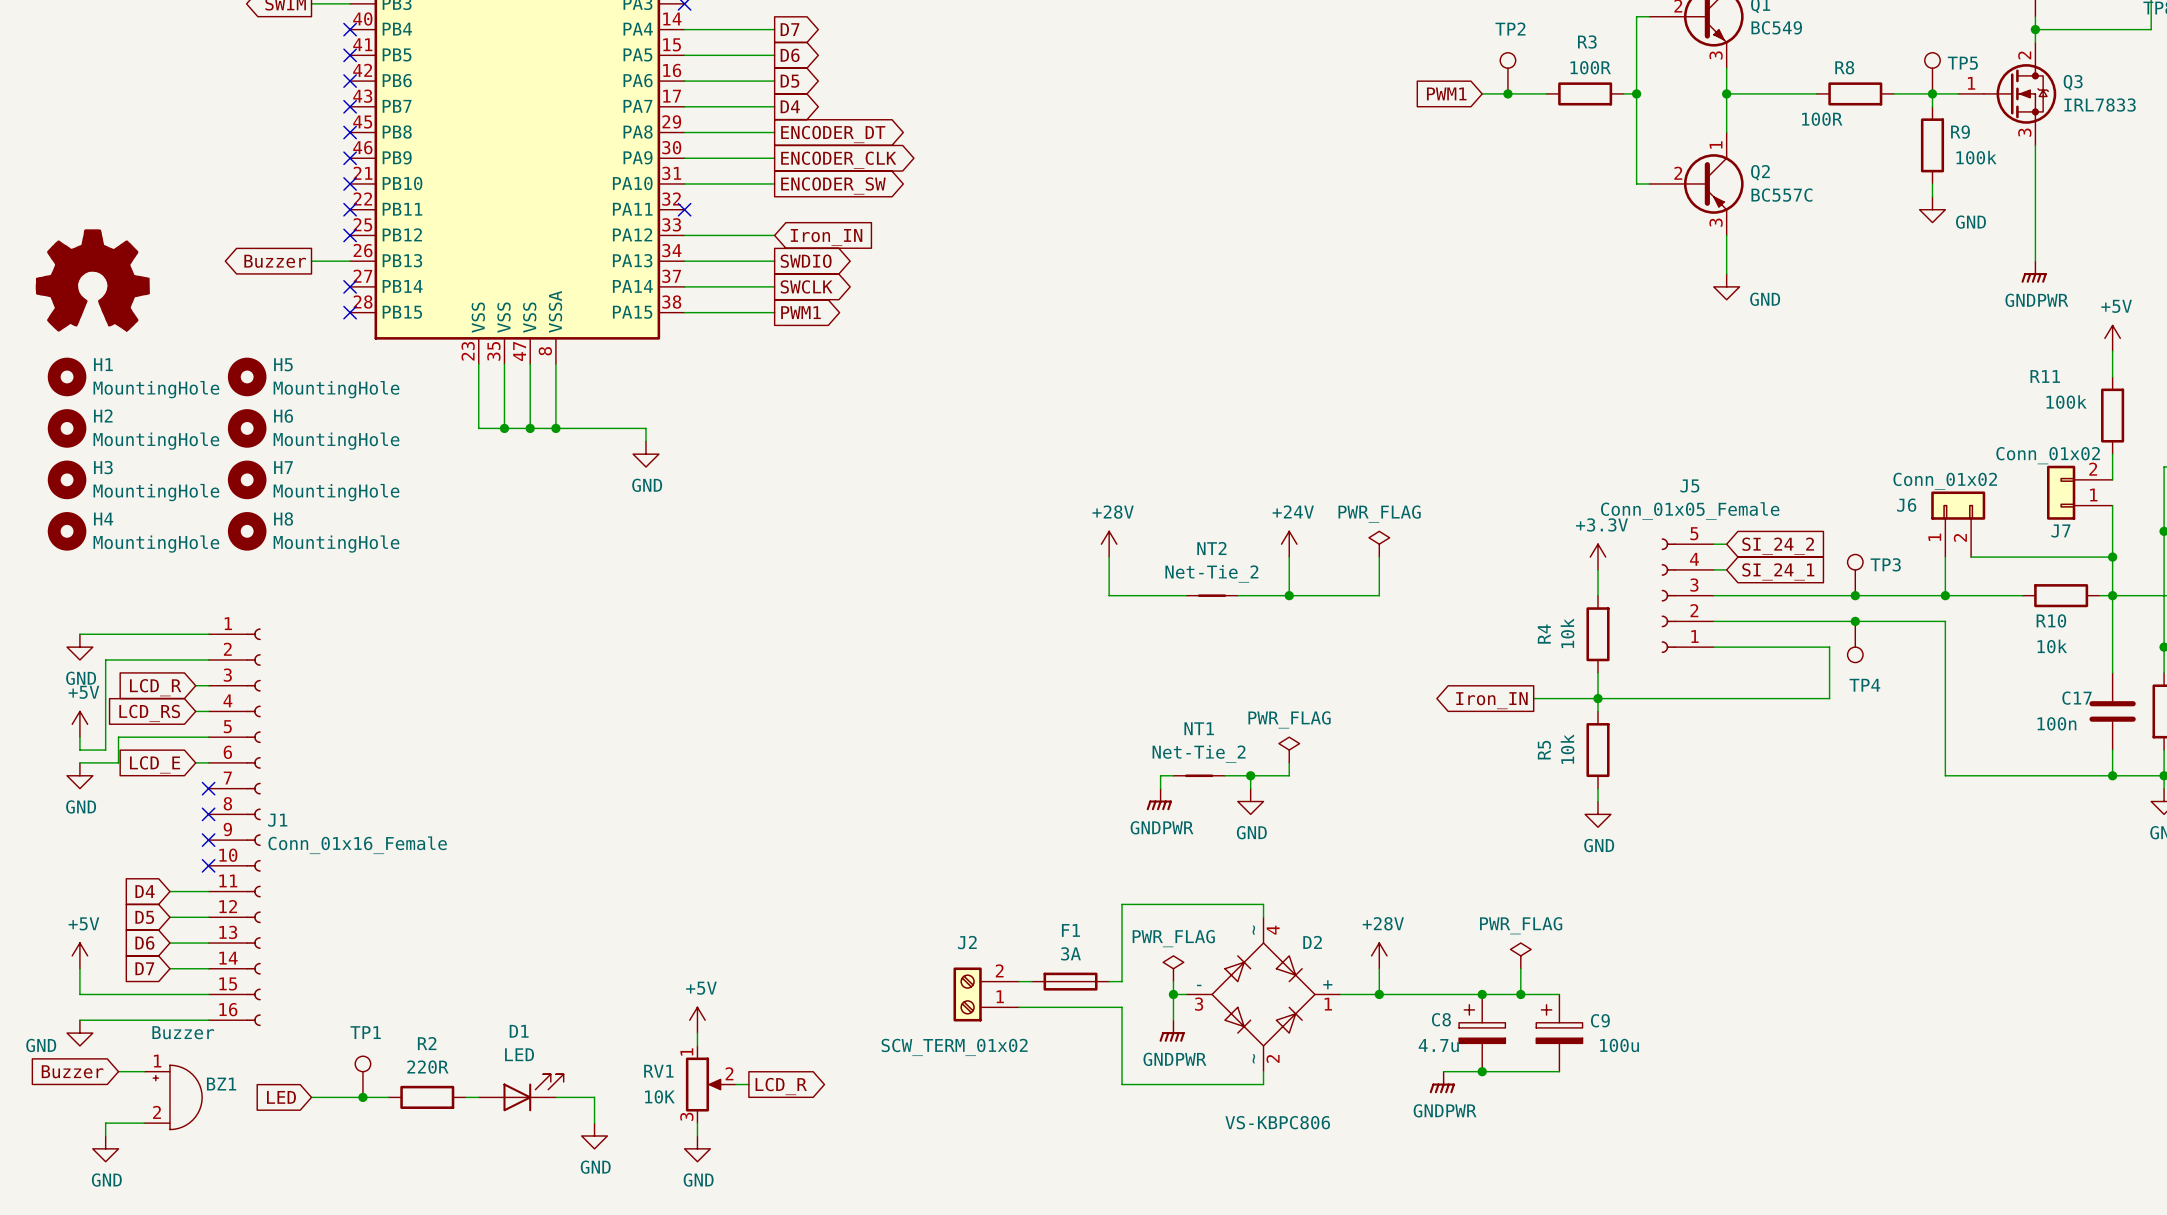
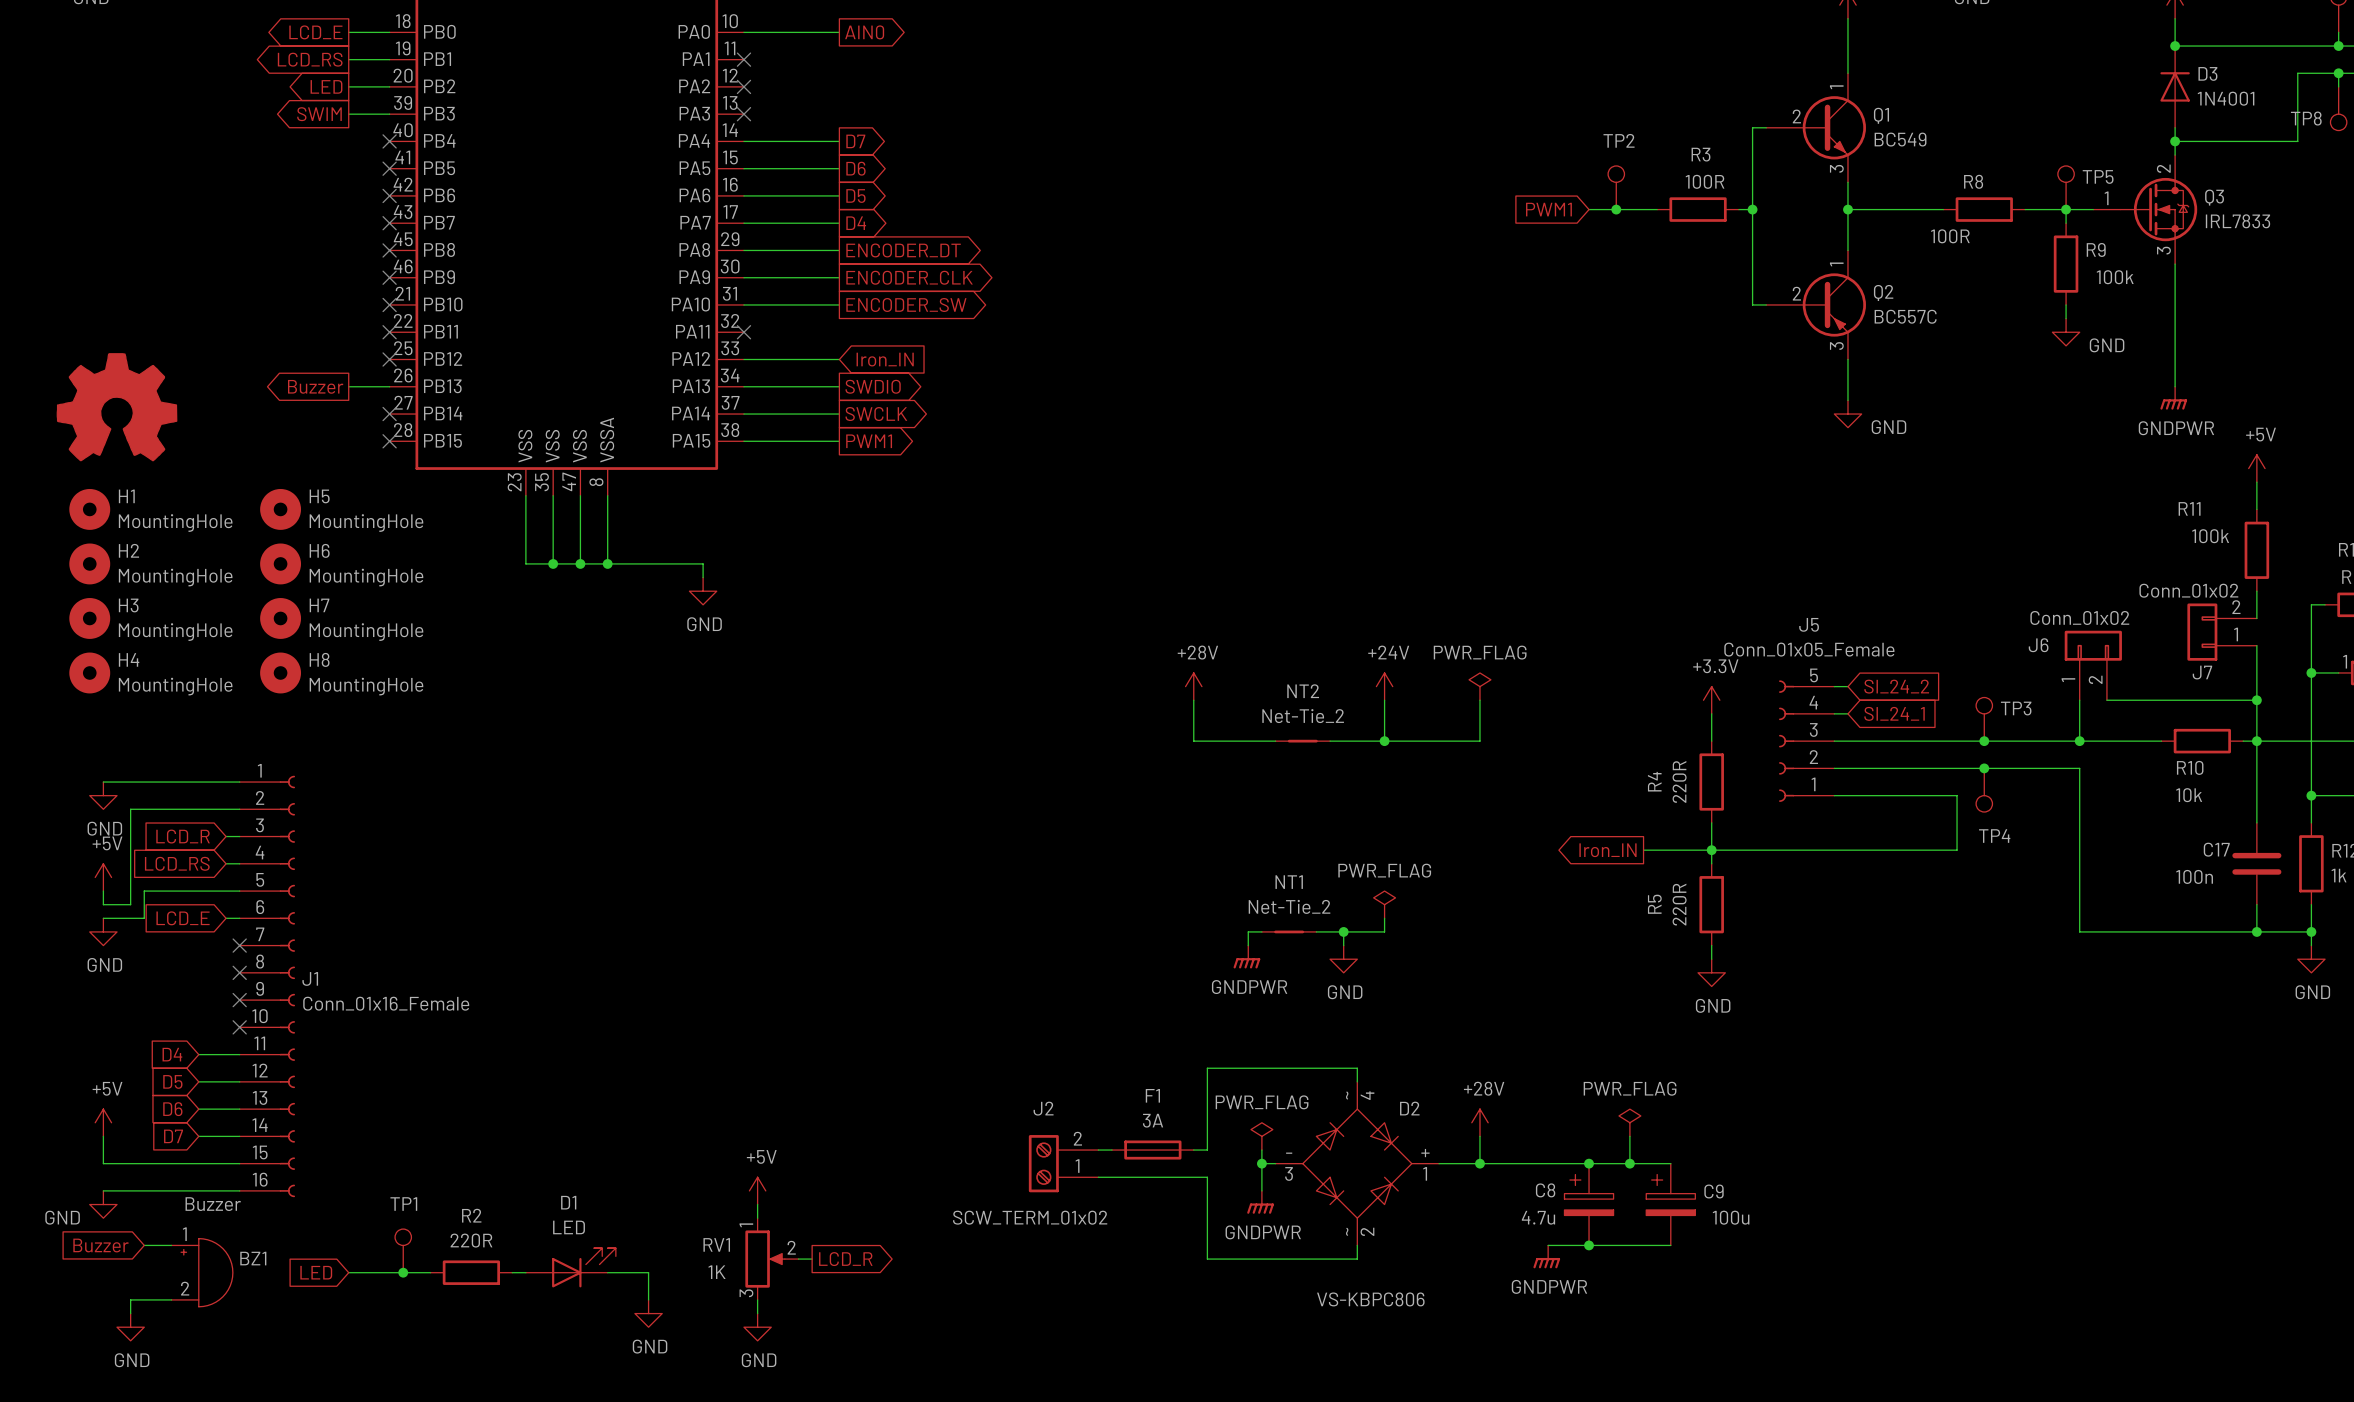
R4 value: 10k (1567, 633) -> 220R (1679, 781)
R5 value: 10k (1567, 749) -> 220R (1679, 904)
RV1 value: 10K (659, 1096) -> 1K (717, 1272)

